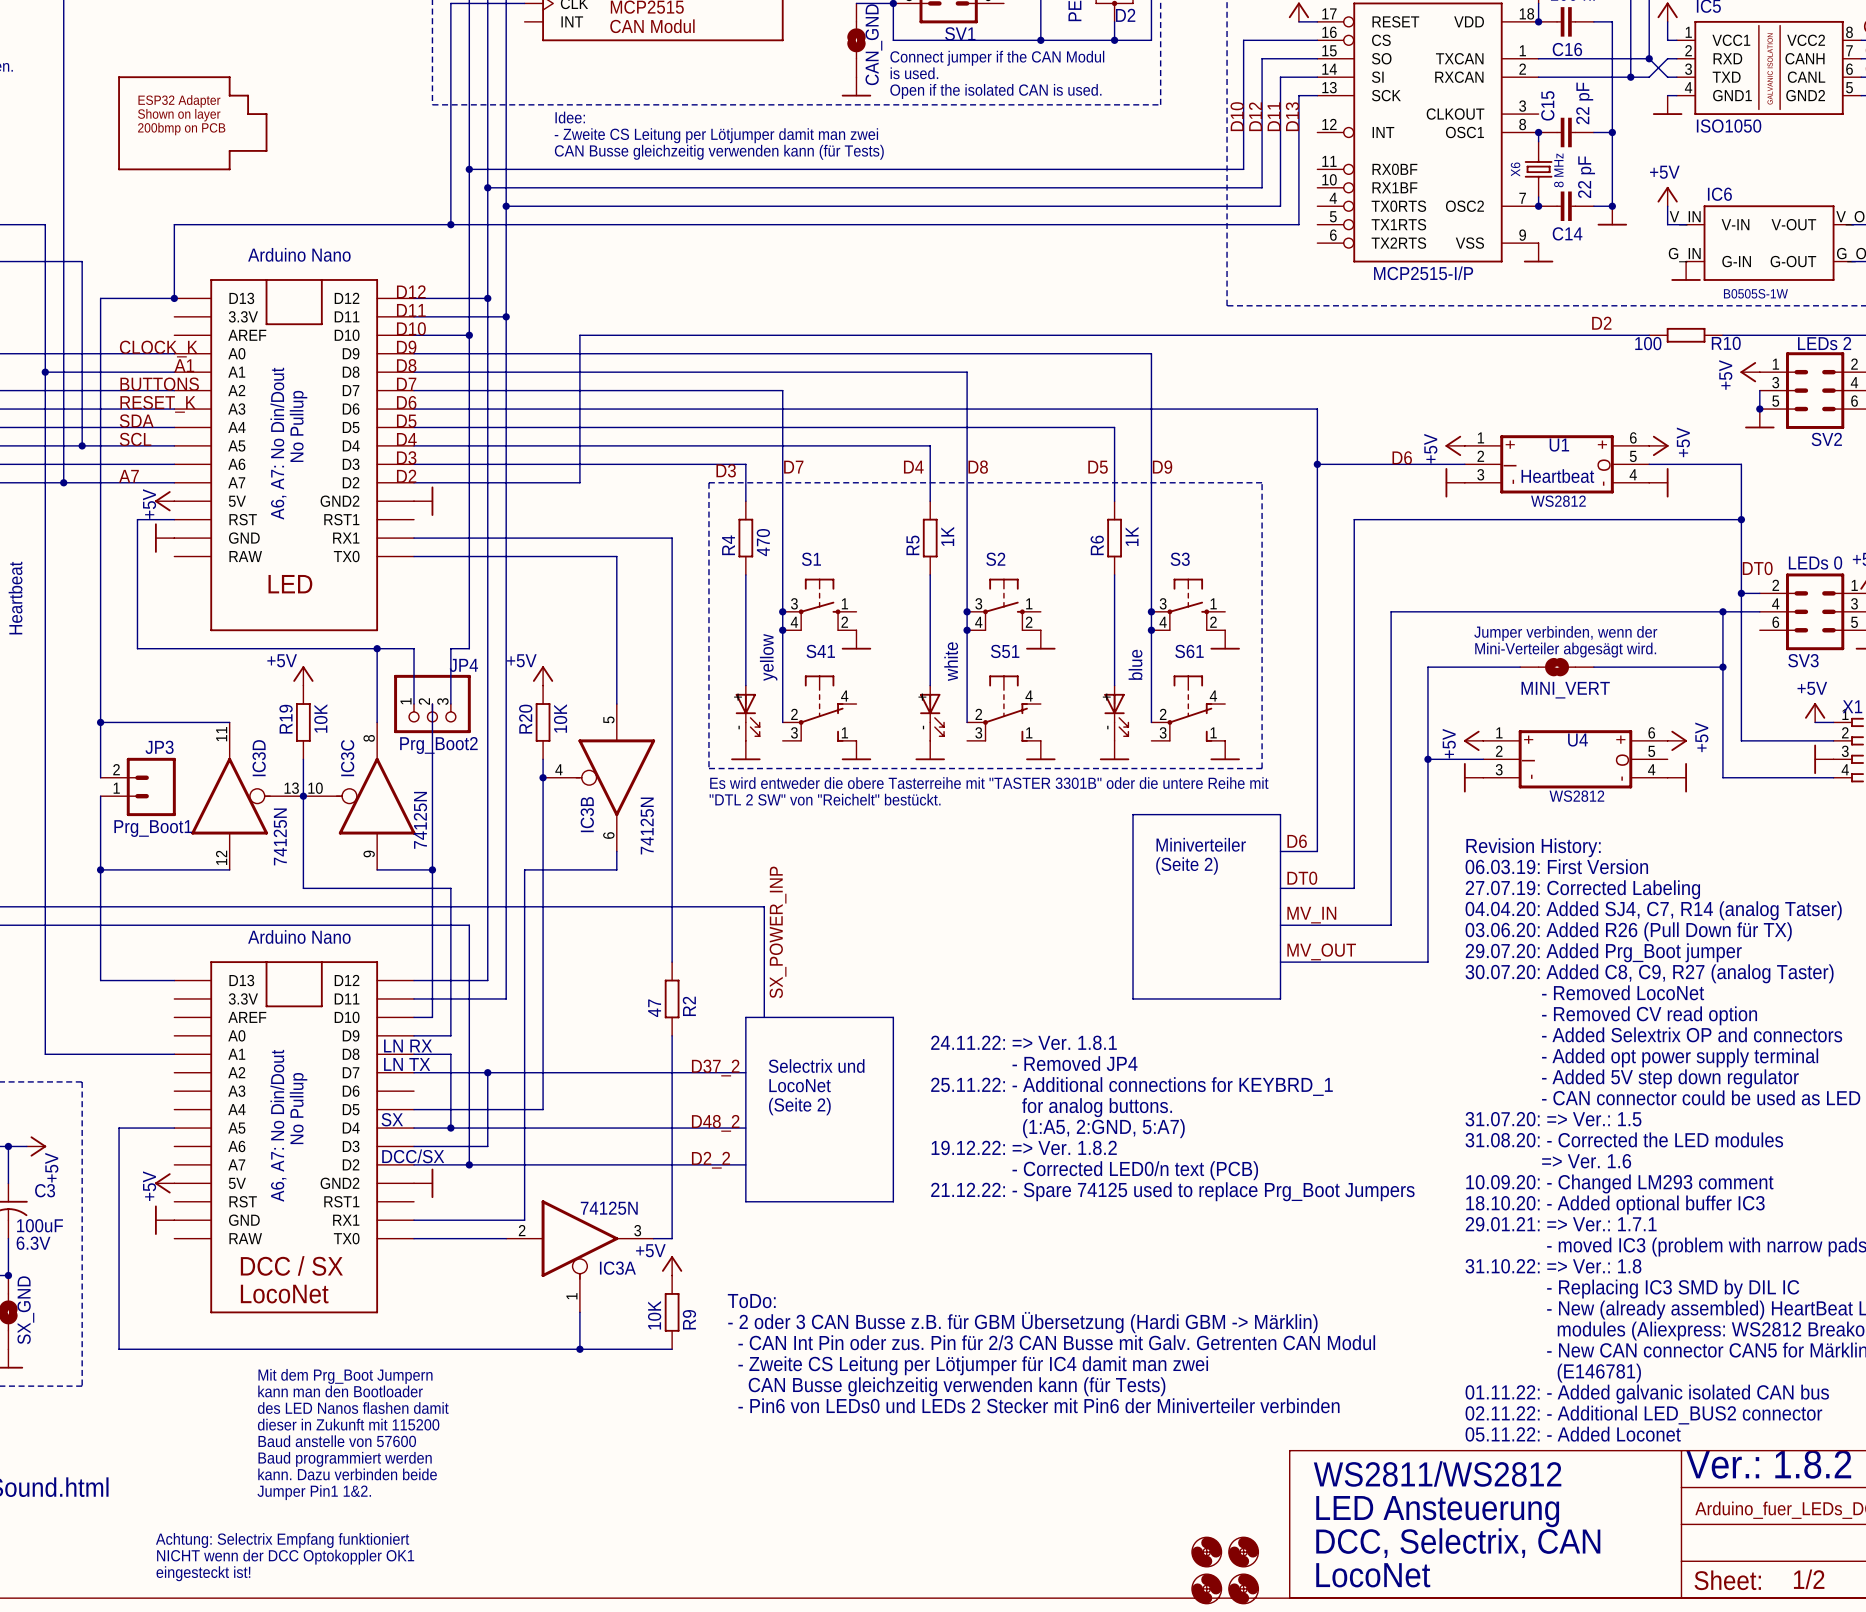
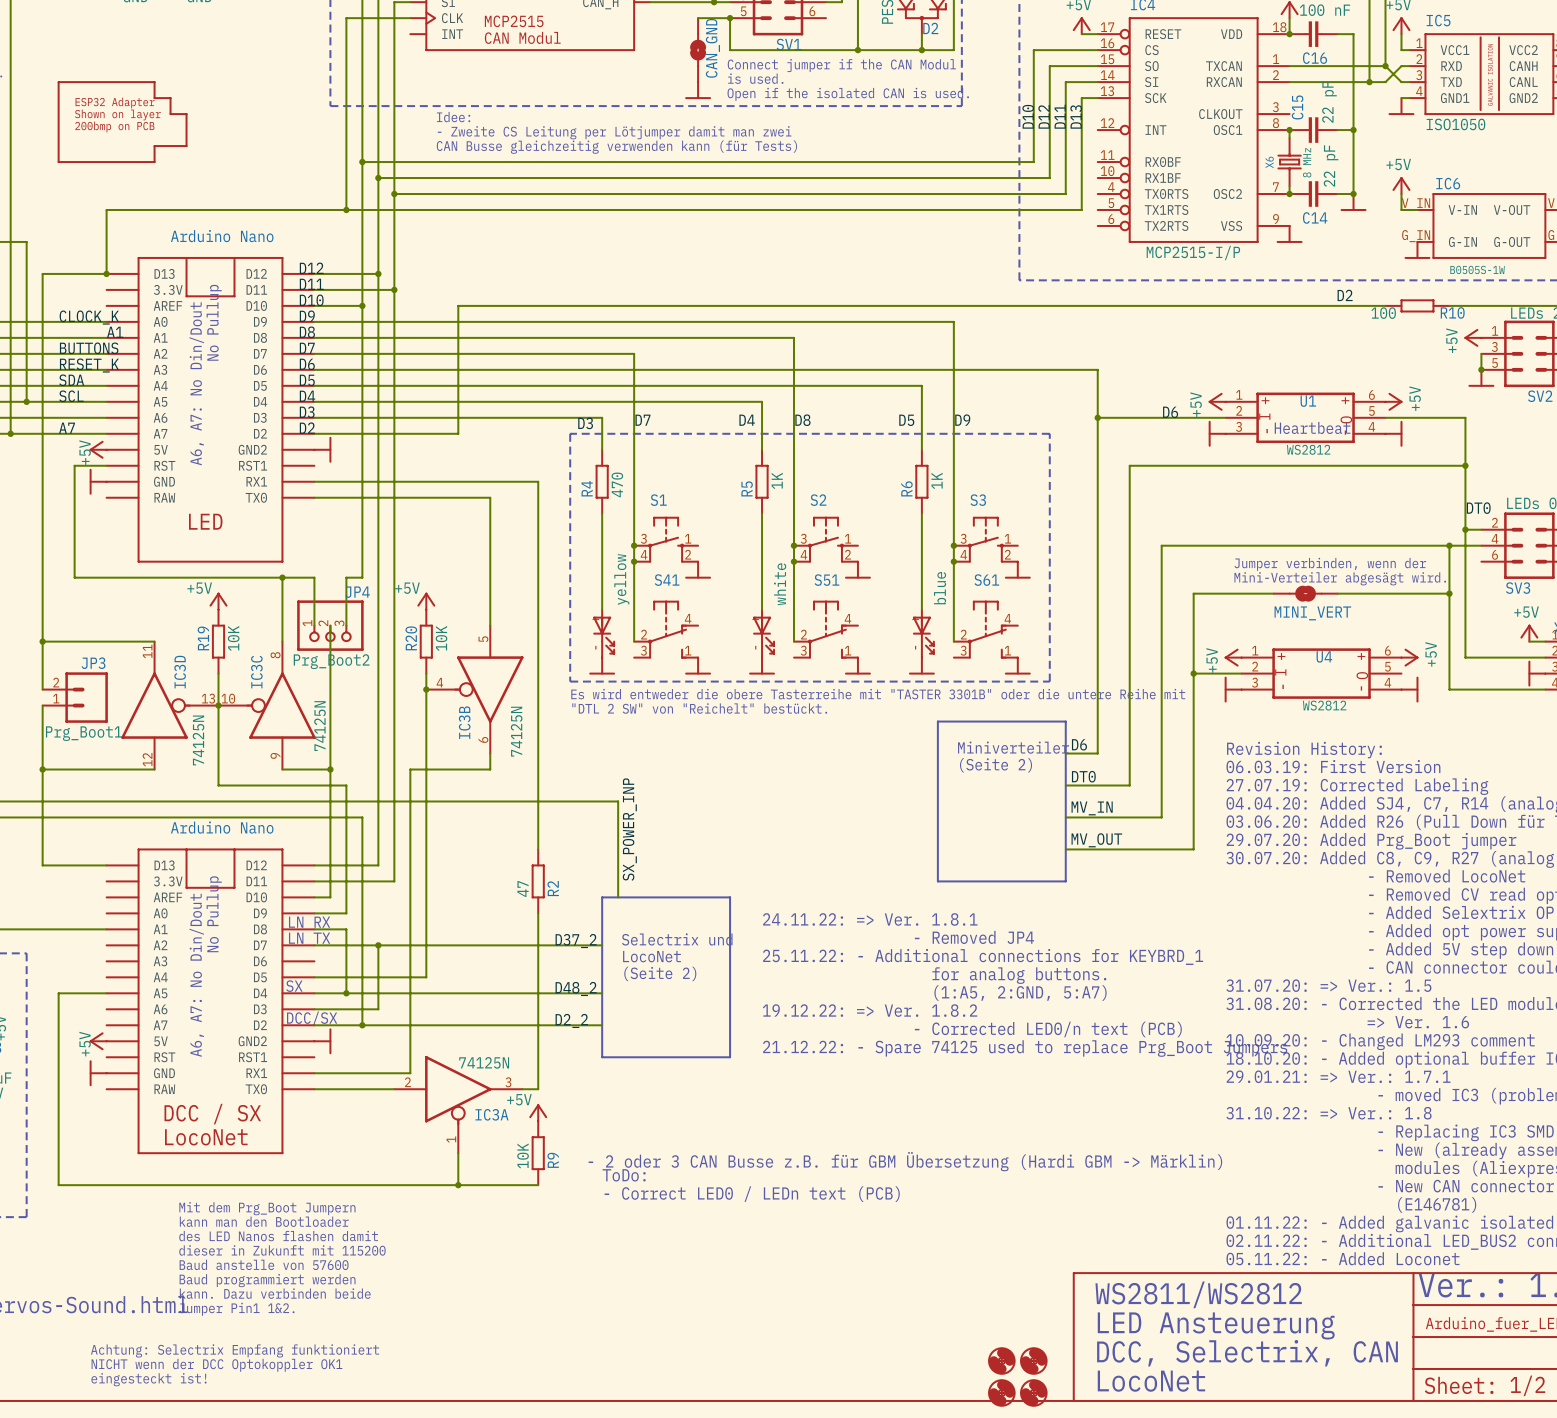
text position: ToDo: (751, 1301) -> ToDo: (624, 1175)
text: - CAN Int Pin oder zus. Pin für 2/3 CAN Busse mit Galv. Getrenten CAN Modul (1056, 1342) -> none
text: none -> - Correct LED0 / LEDn text (PCB) (752, 1194)
text: - Zweite CS Leitung per Lötjumper für IC4 damit man zwei (973, 1365) -> none
text: CAN Busse gleichzeitig verwenden kann (für Tests) (957, 1386) -> none
text: - Pin6 von LEDs0 und LEDs 2 Stecker mit Pin6 der Miniverteiler verbinden (1038, 1405) -> none

